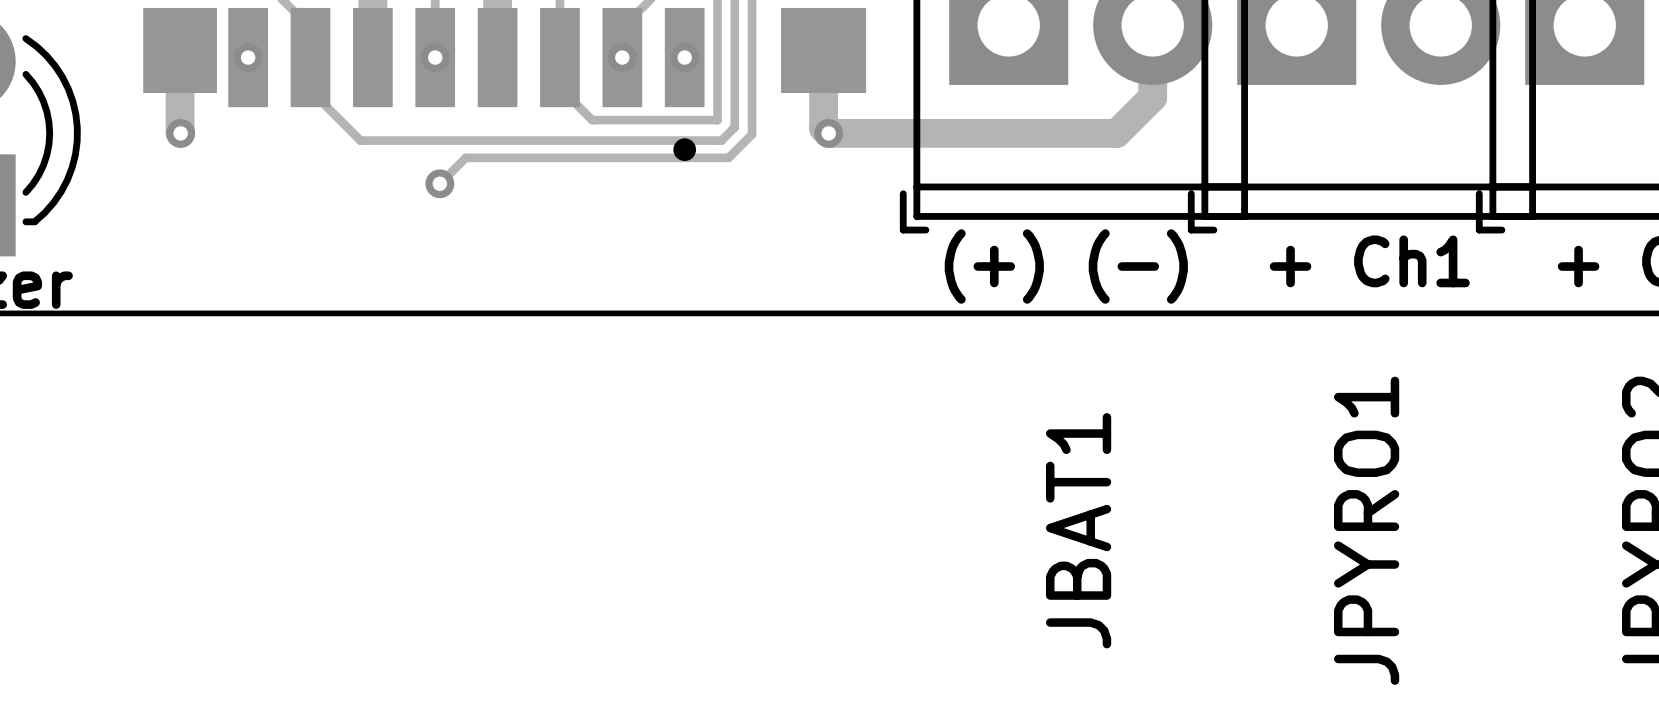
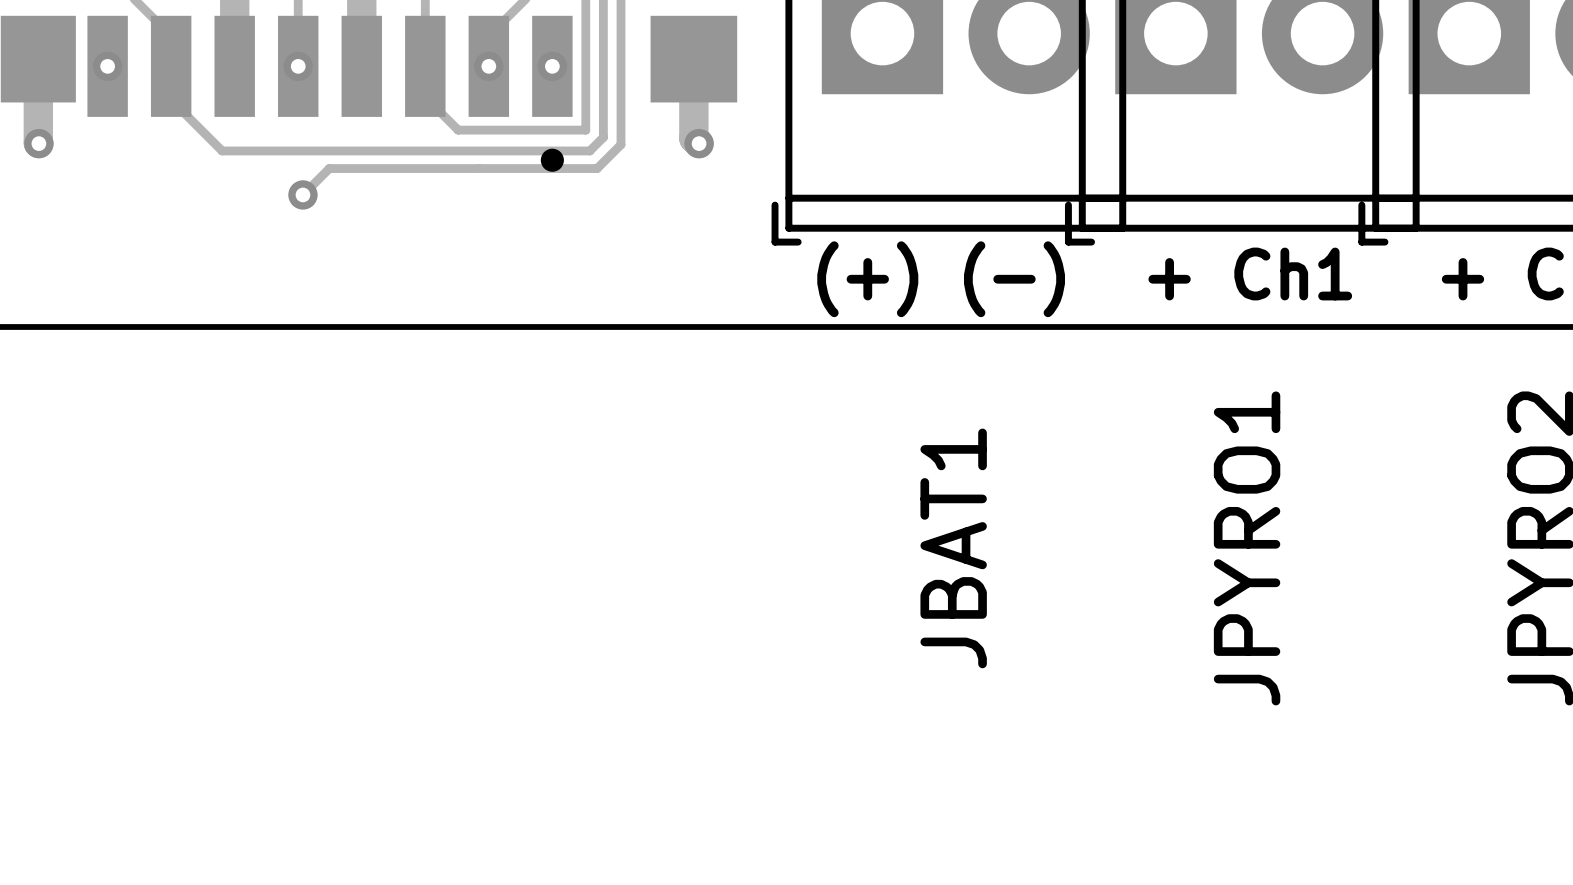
track: (1152, 25) (1152, 97) (1116, 133) (828, 133) -> none

